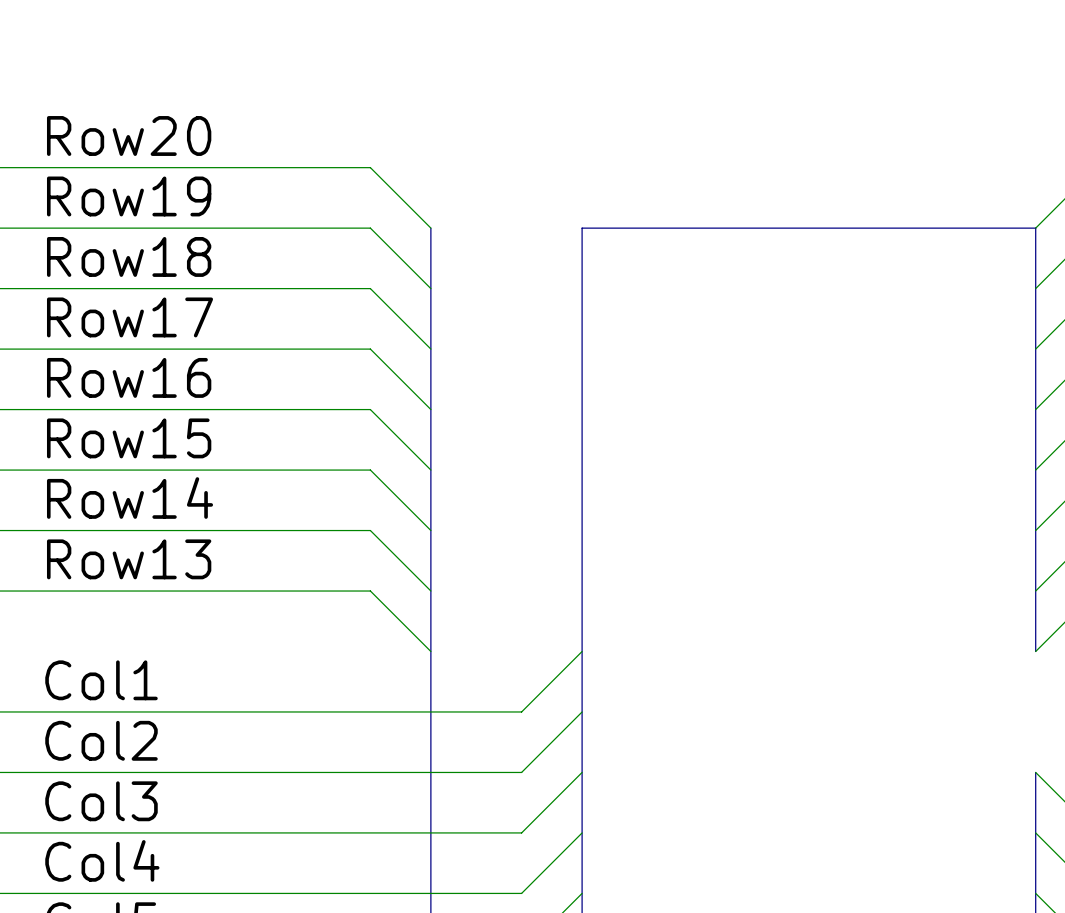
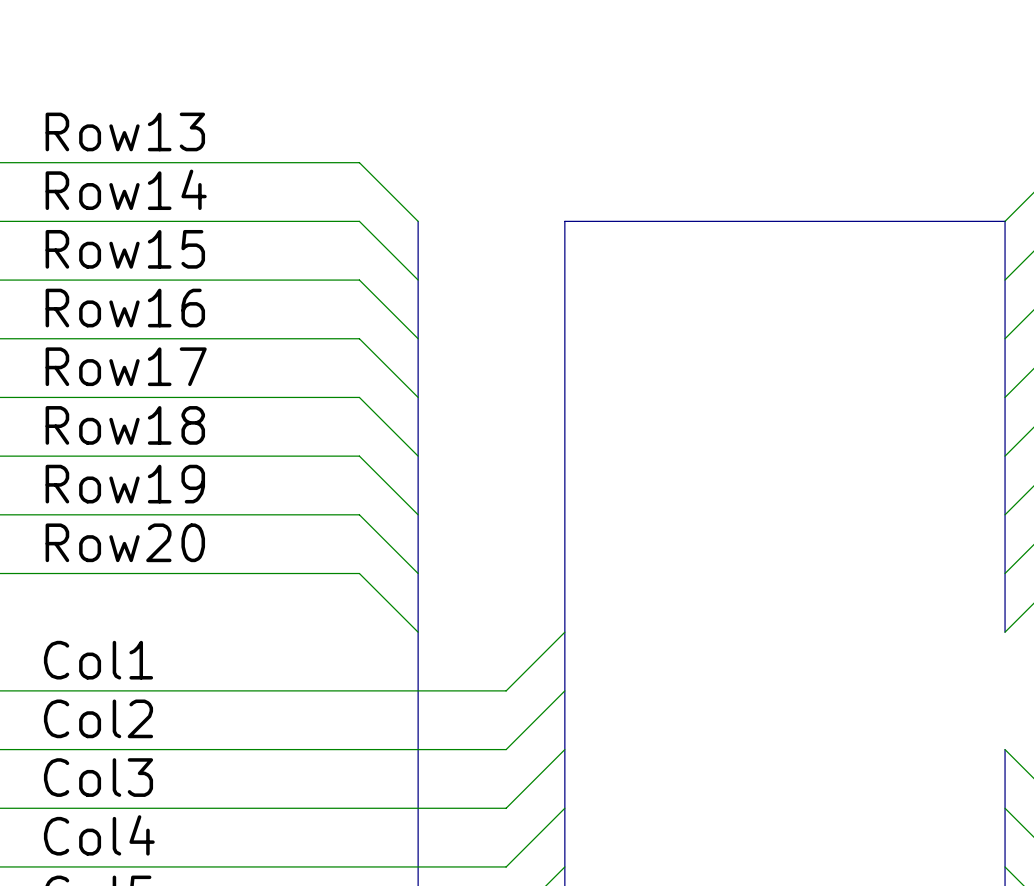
label: Row20 (129, 135) -> Row13 (125, 131)
label: Row19 (129, 196) -> Row14 (126, 189)
label: Row18 (129, 256) -> Row15 (125, 249)
label: Row17 (130, 317) -> Row16 (125, 308)
label: Row16 (129, 377) -> Row17 (126, 366)
label: Row15 (129, 438) -> Row18 (125, 425)
label: Row14 (130, 498) -> Row19 (125, 484)
label: Row13 (129, 559) -> Row20 (125, 542)

